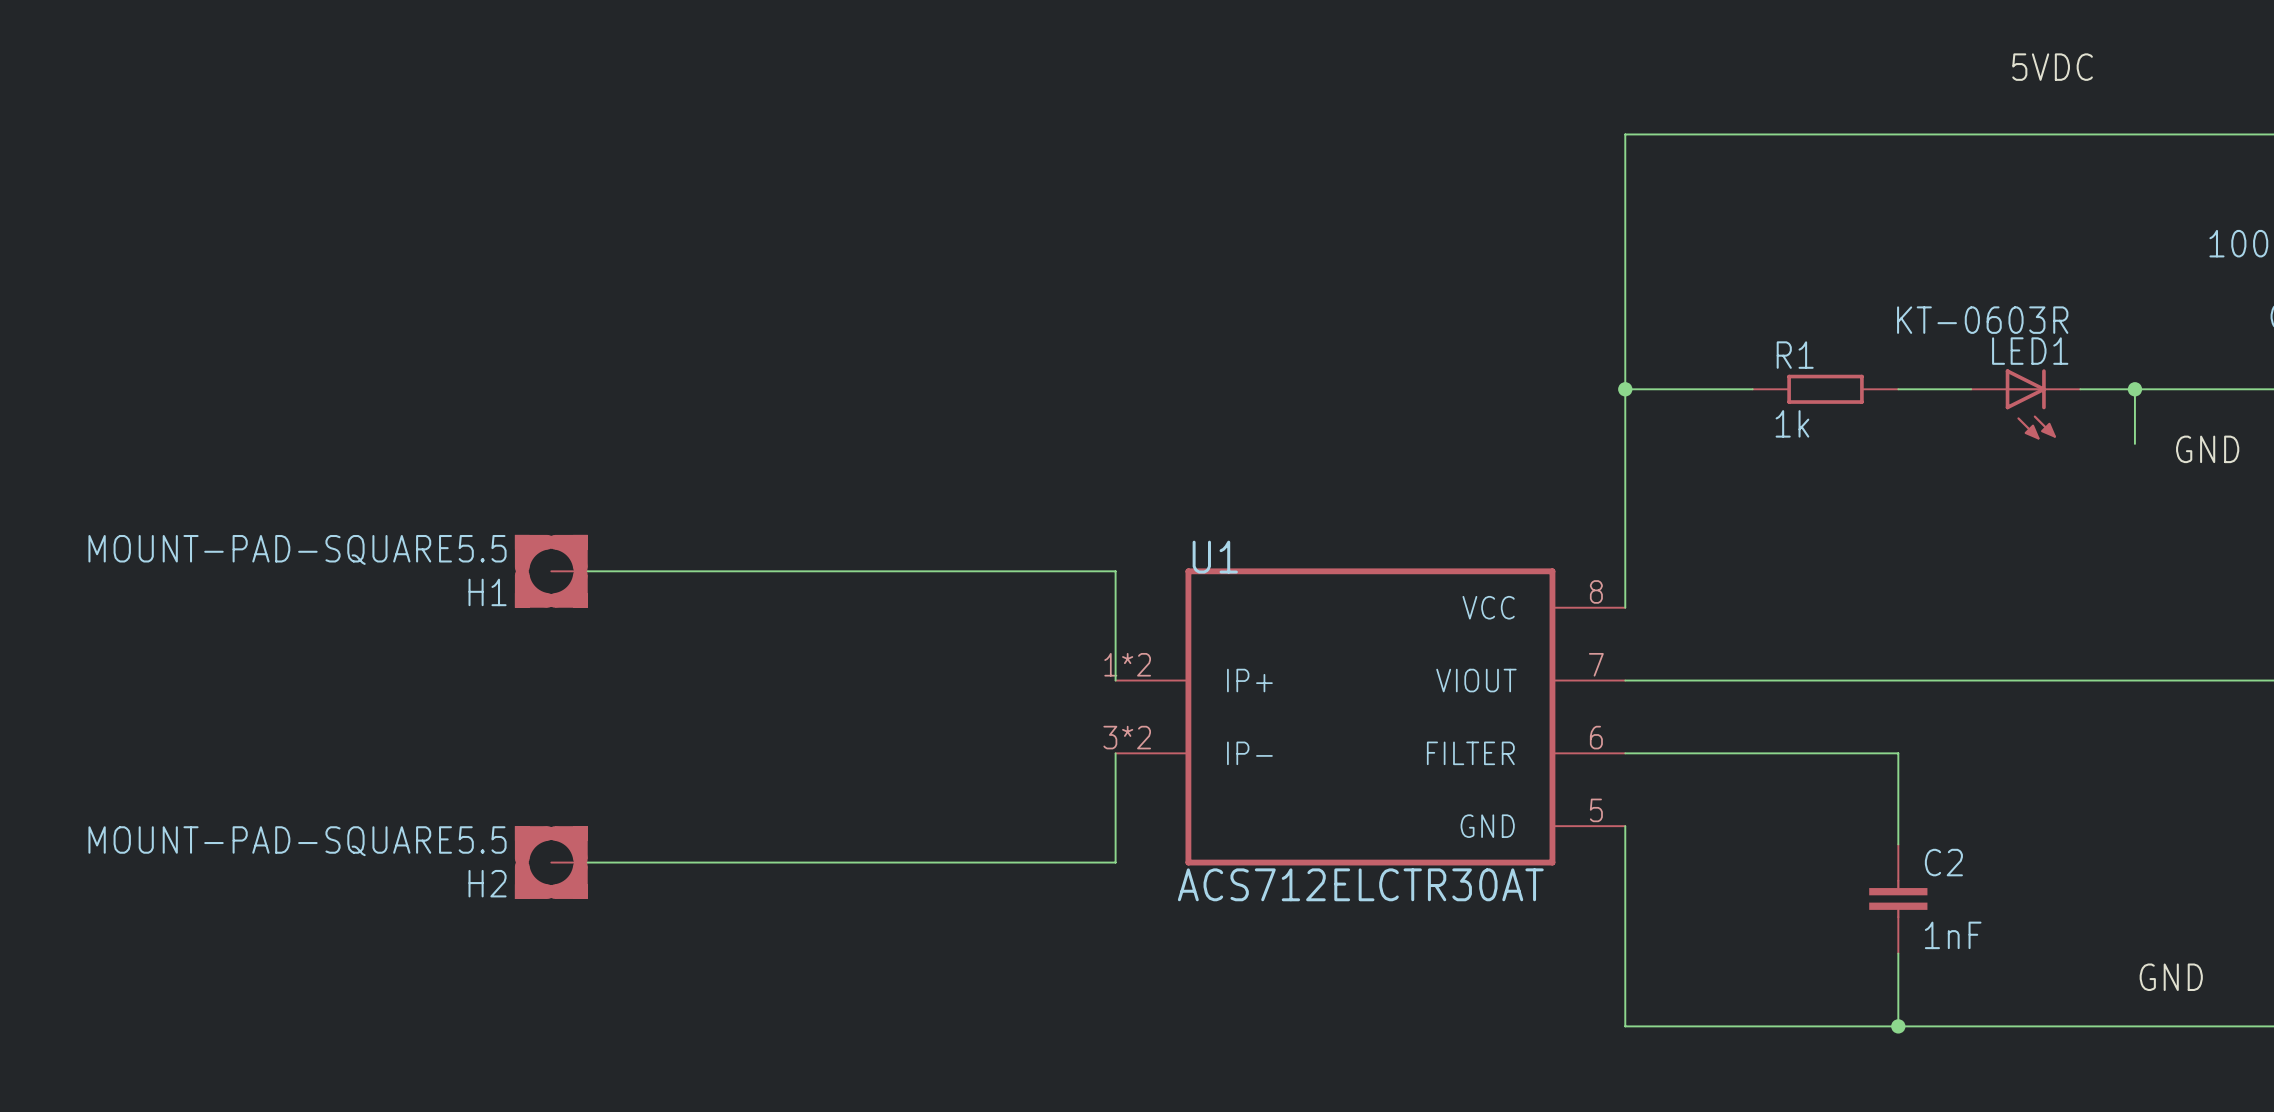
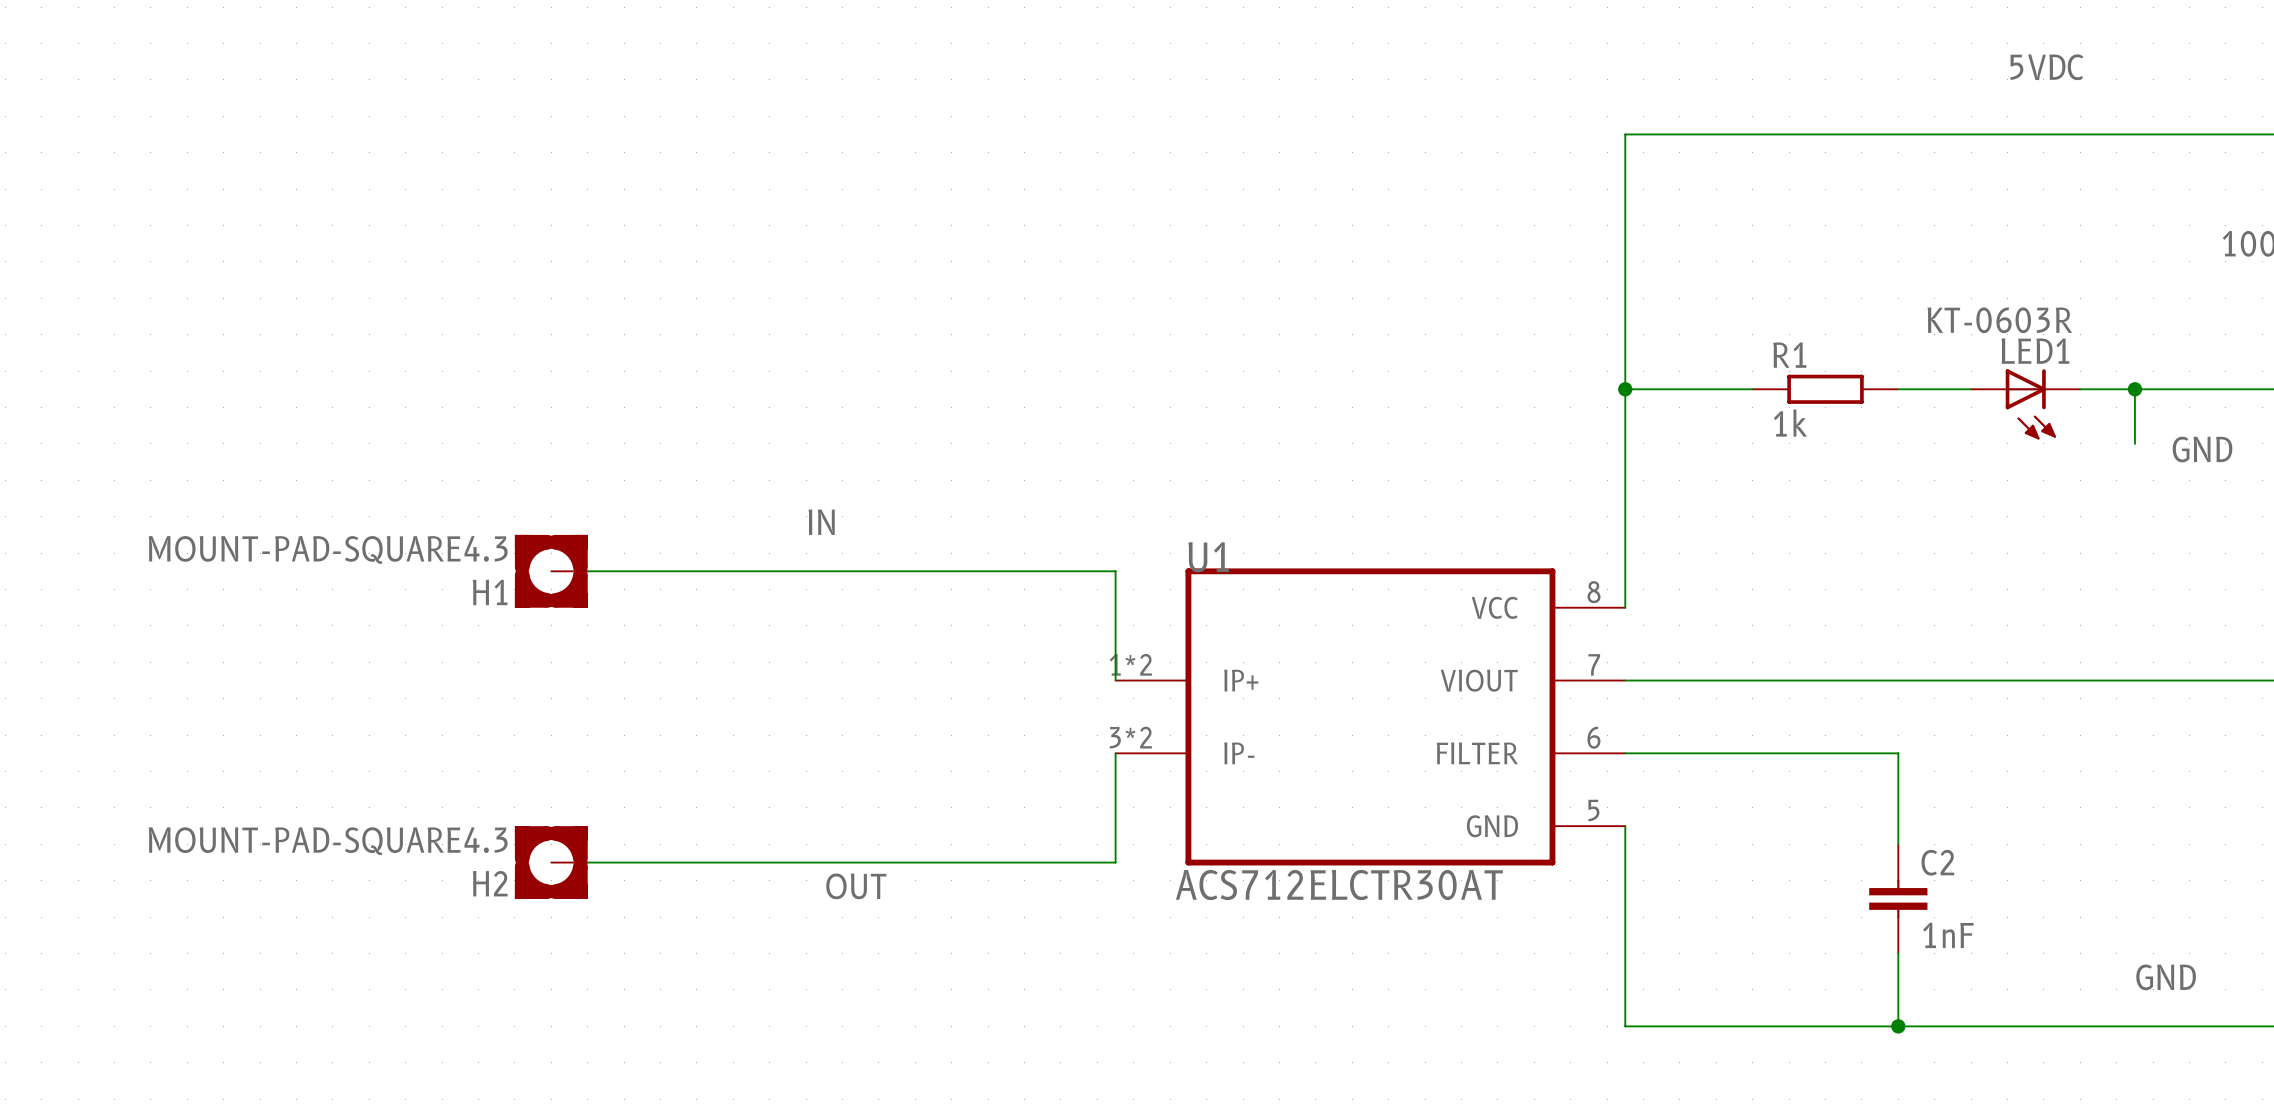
label: none -> IN (821, 522)
H1 value: MOUNT-PAD-SQUARE5.5 (297, 549) -> MOUNT-PAD-SQUARE4.3 (328, 549)
H2 value: MOUNT-PAD-SQUARE5.5 (297, 841) -> MOUNT-PAD-SQUARE4.3 (328, 841)
label: none -> OUT (856, 886)

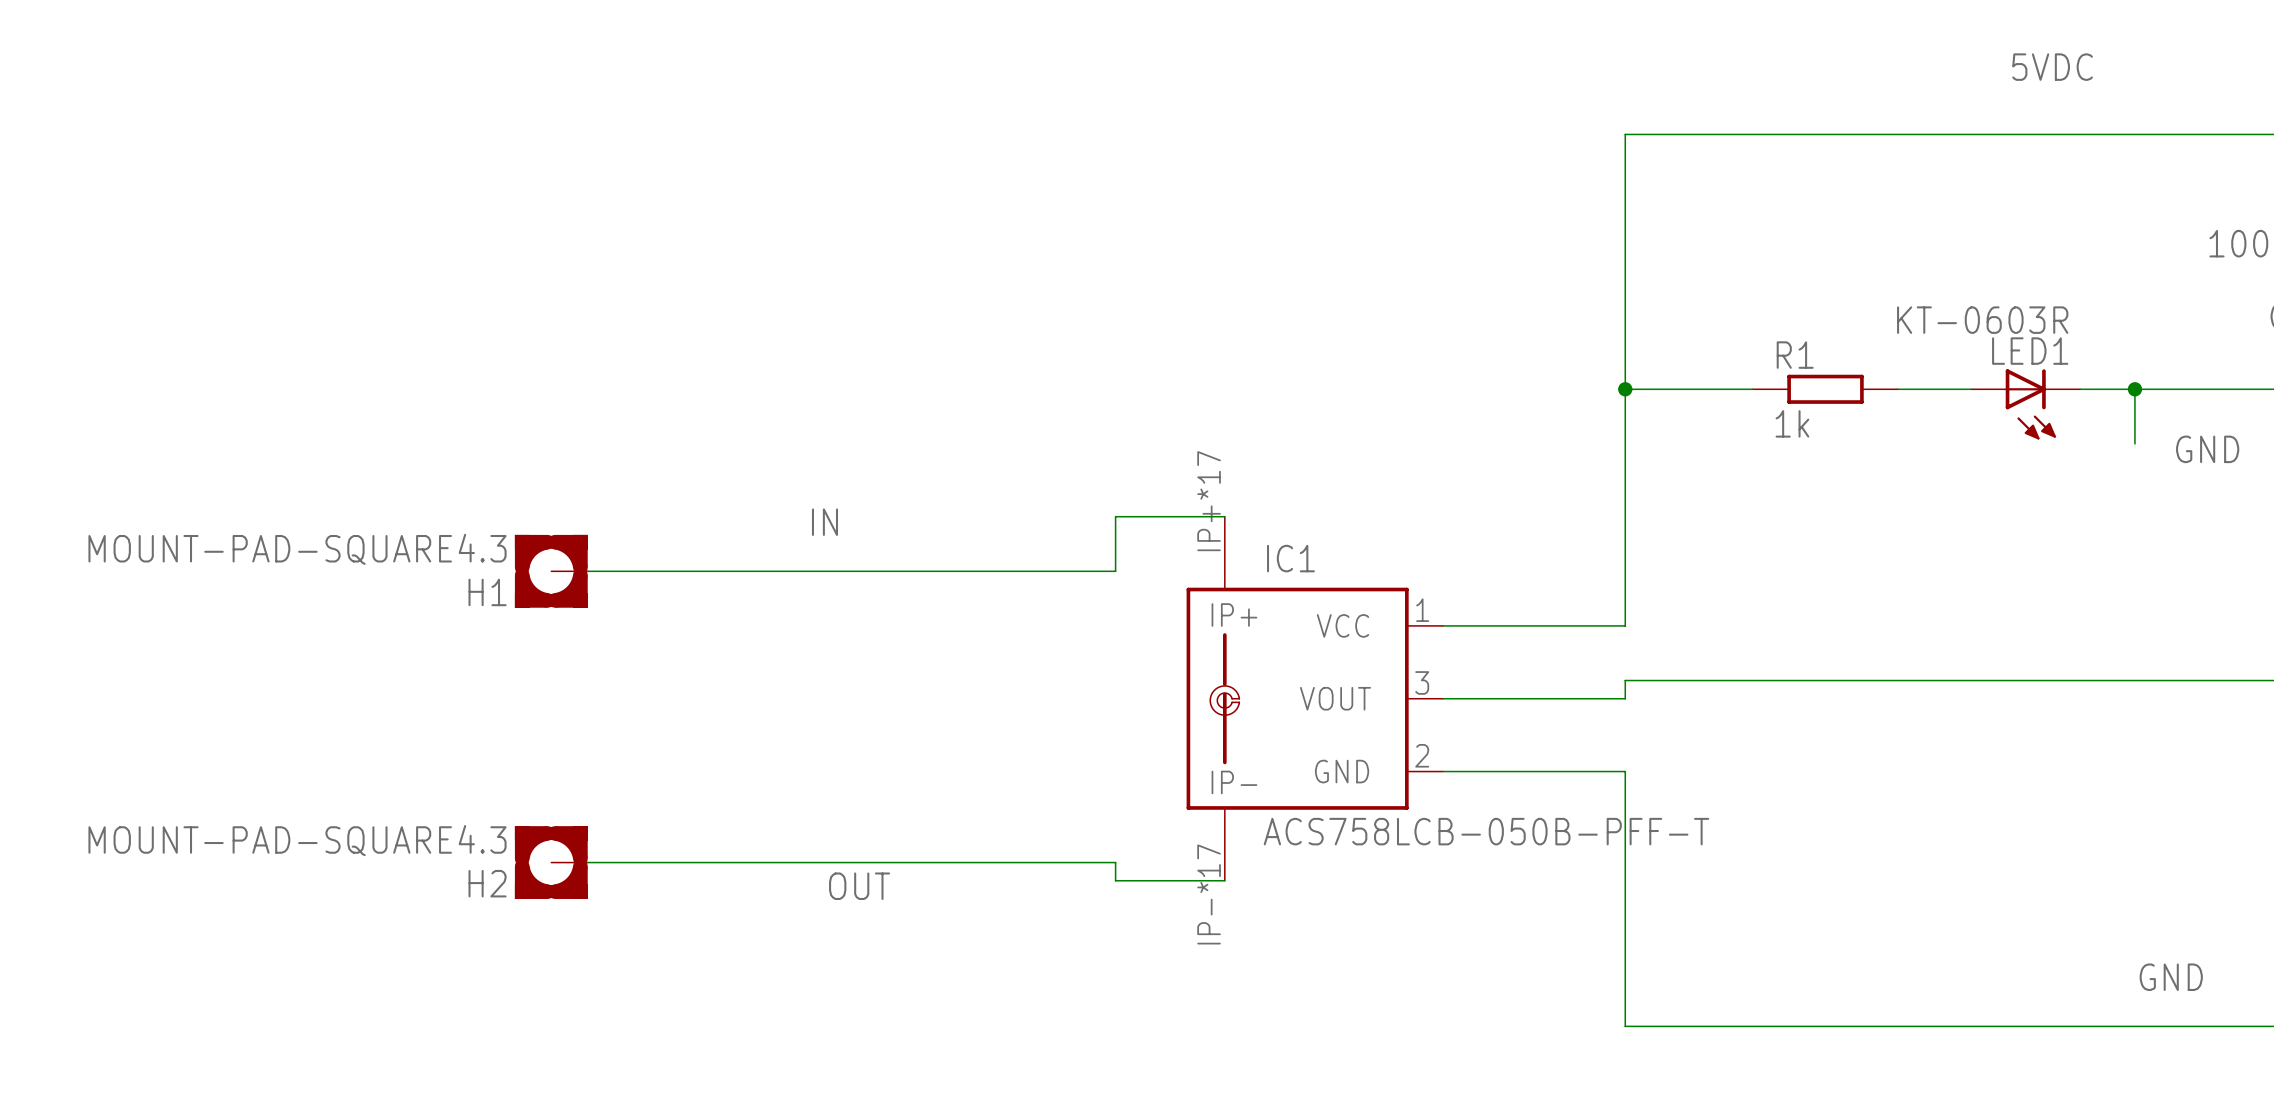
wire: (1115, 571) (1115, 680) -> (1115, 571) (1115, 516) (1224, 516)
wire: none -> (1625, 607) (1625, 625) (1443, 625)
wire: none -> (1625, 680) (1625, 698) (1443, 698)
IC1: none -> ACS758LCB-050B-PFF-T (1314, 698)
U1: ACS712ELCTR30AT (1370, 716) -> none
wire: (1115, 753) (1115, 862) -> (1224, 880) (1115, 880) (1115, 862)
wire: (1625, 753) (1898, 753) (1898, 844) -> none
wire: none -> (1443, 771) (1625, 771) (1625, 826)
C2: 1nF (1898, 898) -> none
wire: (1898, 953) (1898, 1026) -> none
junction: (1898, 1026) -> none

